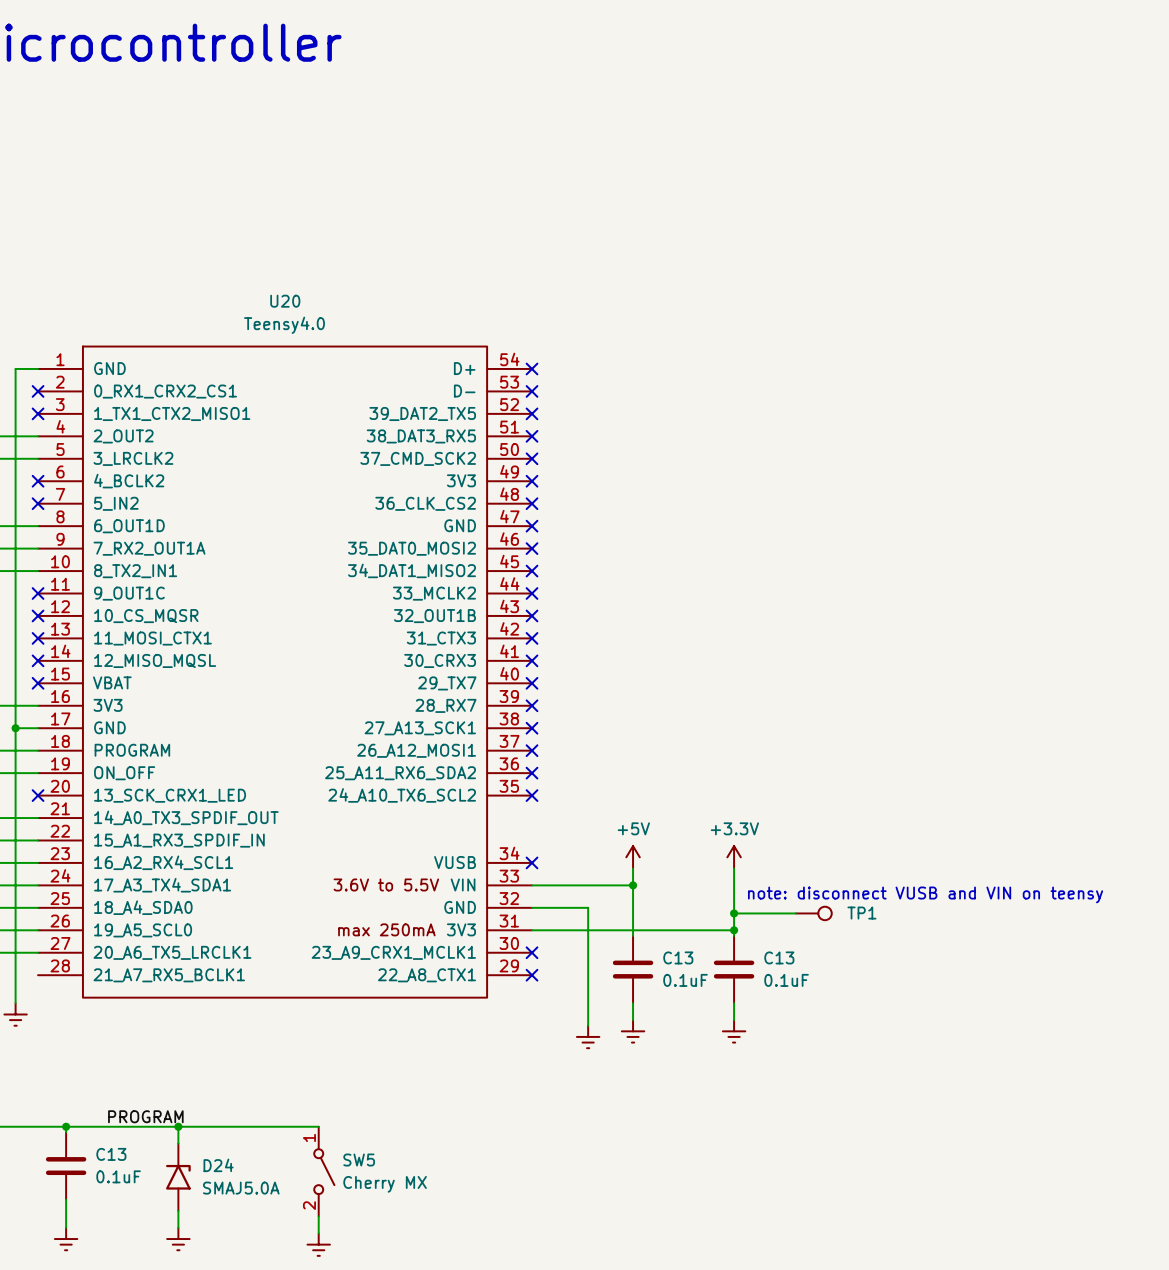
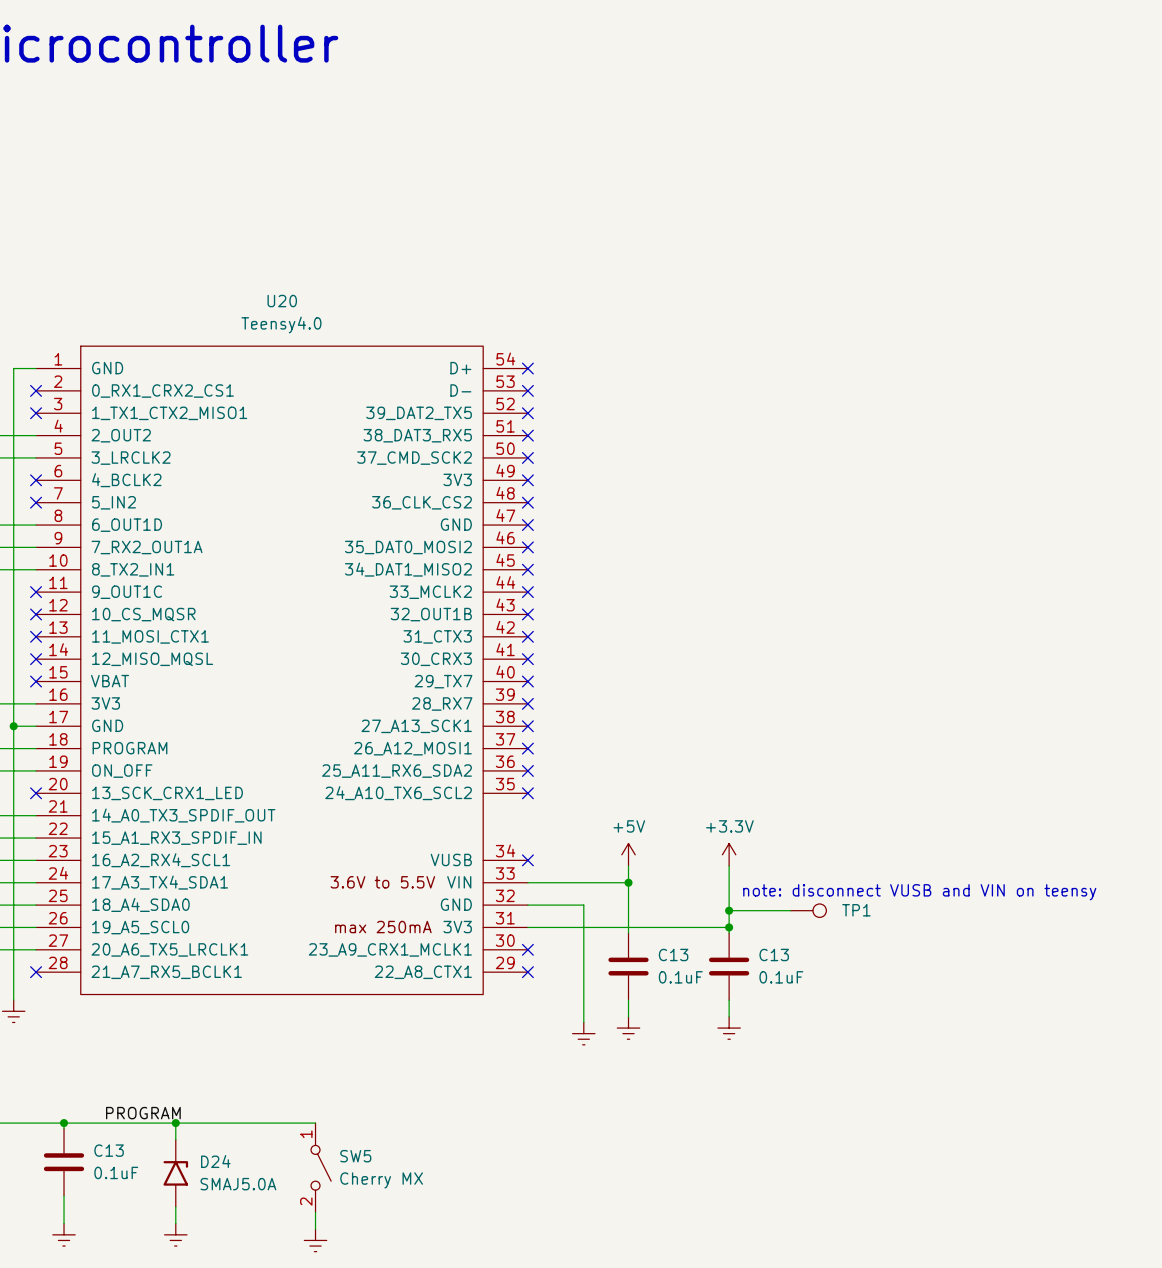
no-connect mark: none -> (36, 972)

